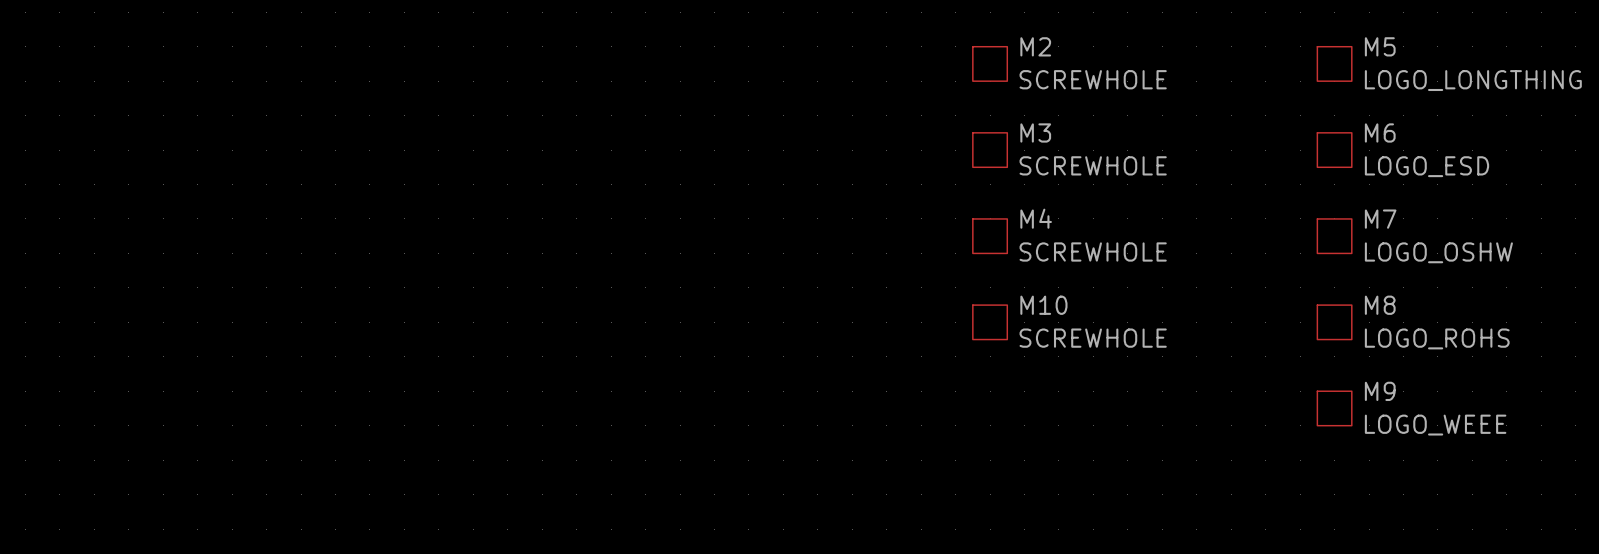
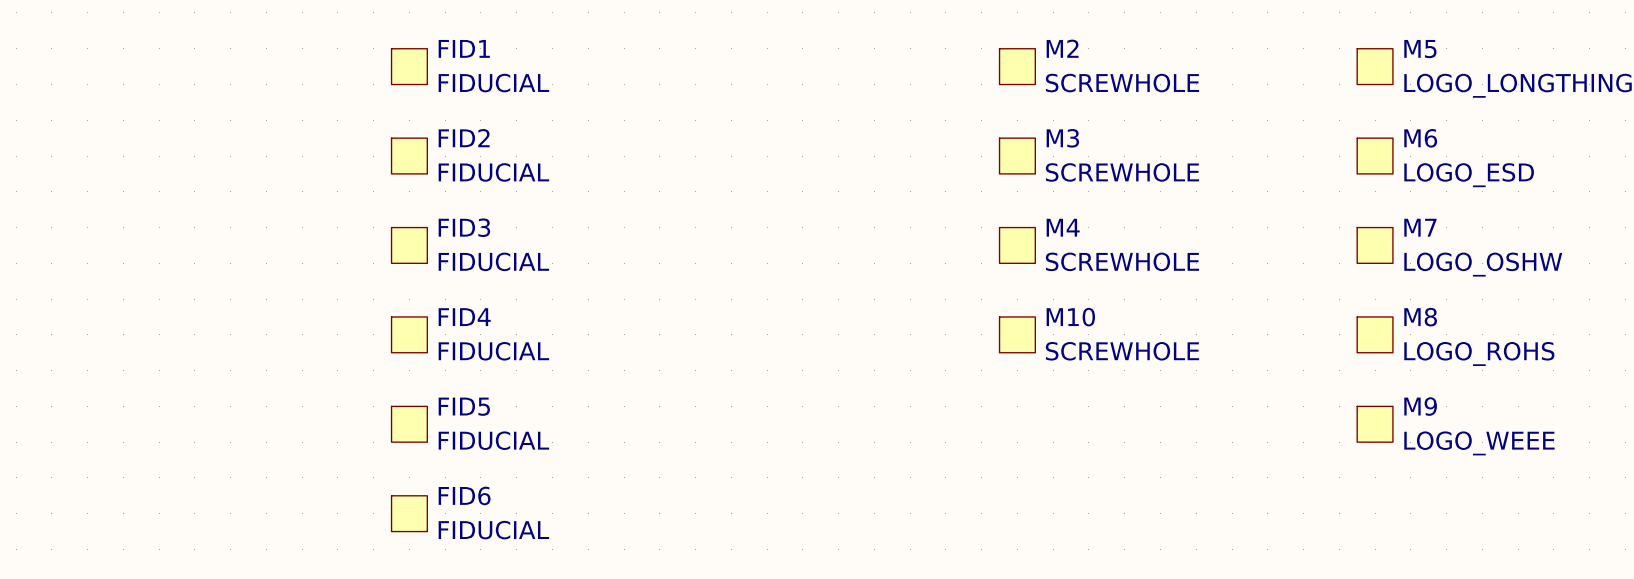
FID1: none -> FIDUCIAL (409, 66)
FID2: none -> FIDUCIAL (409, 156)
FID3: none -> FIDUCIAL (409, 245)
FID4: none -> FIDUCIAL (409, 334)
FID5: none -> FIDUCIAL (409, 424)
FID6: none -> FIDUCIAL (409, 513)

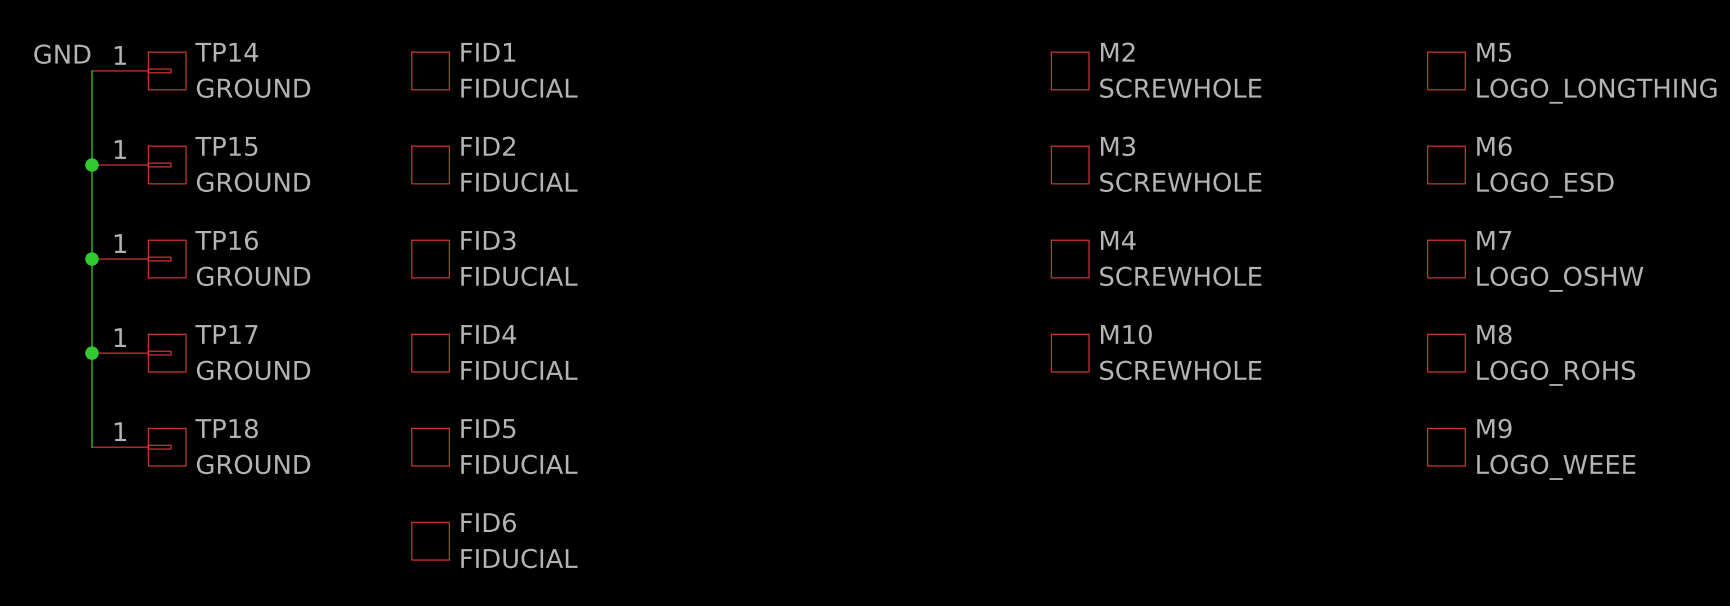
label: none -> GND (62, 54)
wire: none -> (91, 70) (91, 447)
TP14: none -> GROUND (138, 70)
junction: none -> (91, 165)
TP15: none -> GROUND (138, 165)
junction: none -> (91, 259)
TP16: none -> GROUND (138, 259)
junction: none -> (91, 353)
TP17: none -> GROUND (138, 353)
TP18: none -> GROUND (138, 447)

